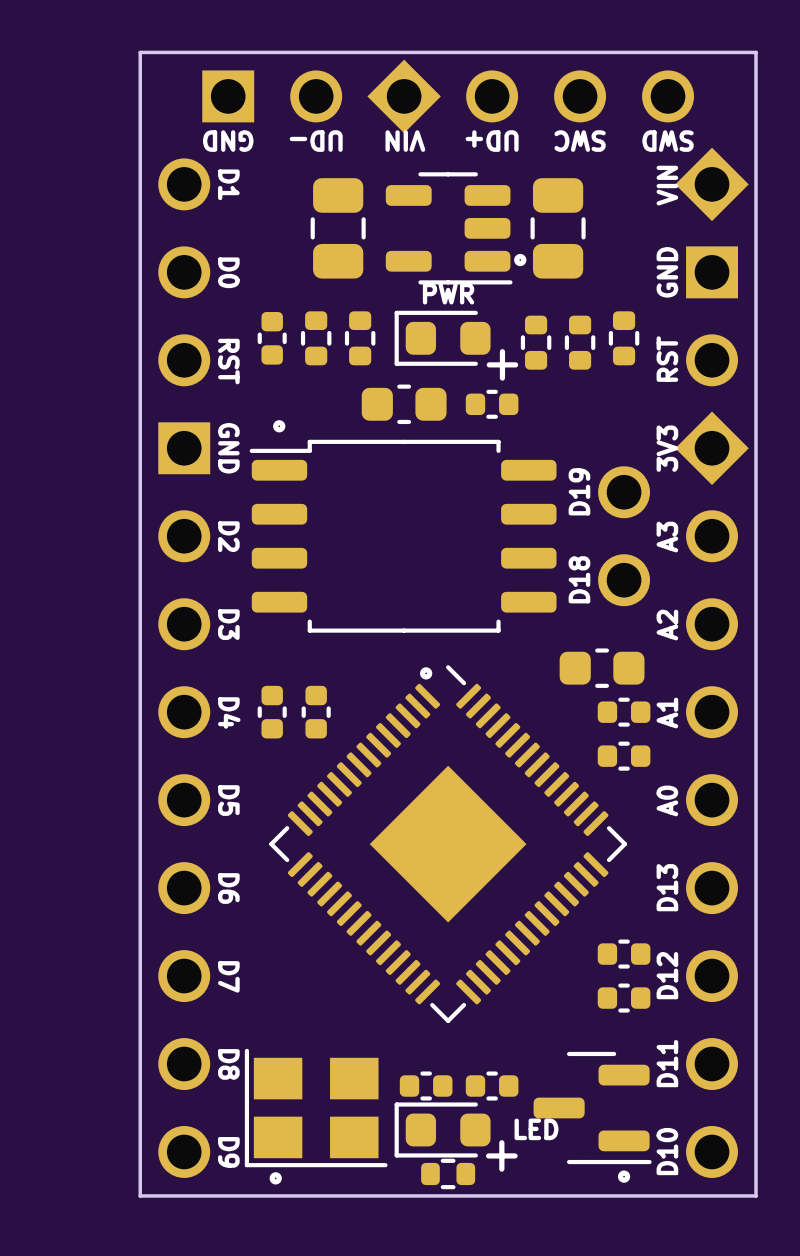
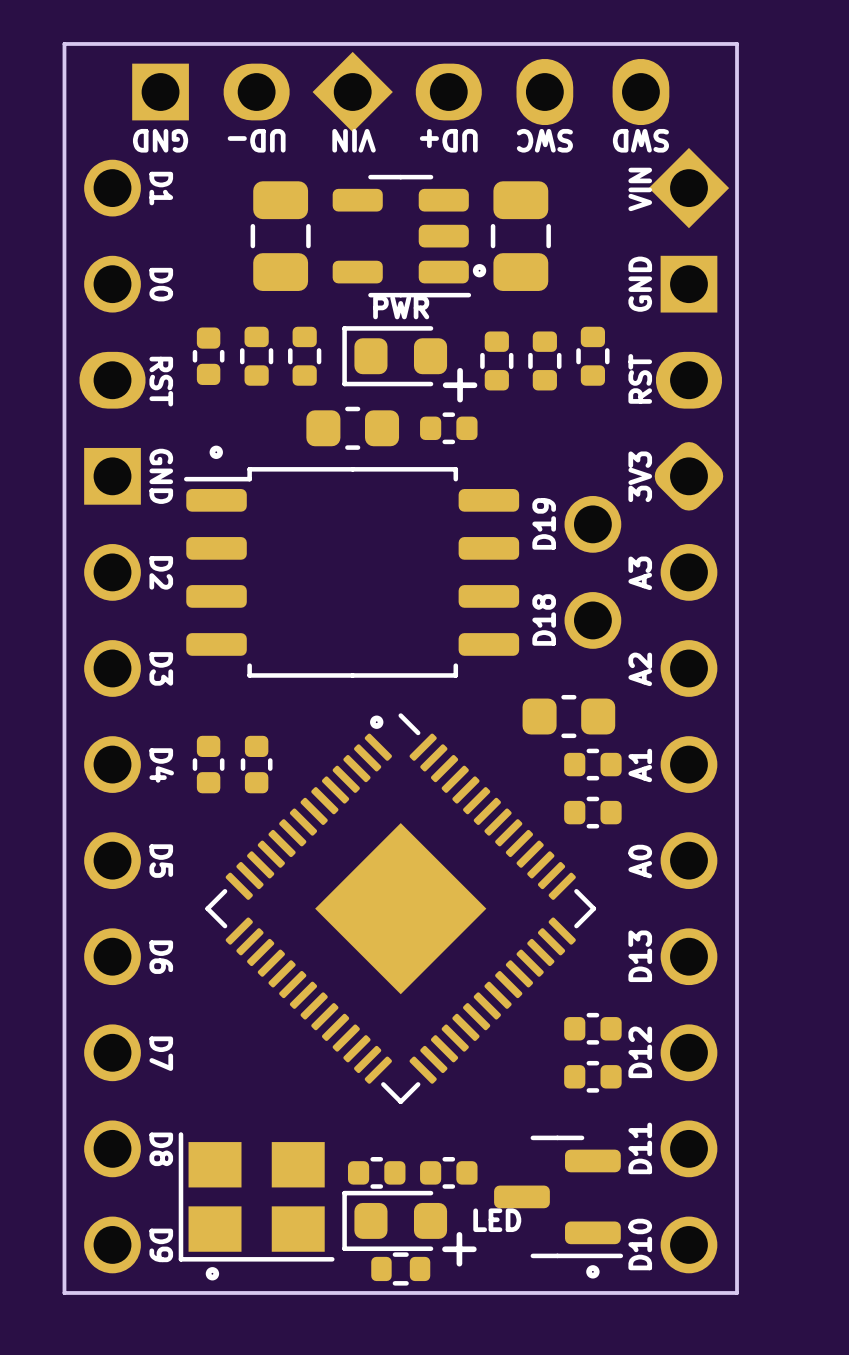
part footprint: [202, 59, 695, 134] -> [132, 51, 670, 133]
part footprint: [675, 147, 749, 1178] -> [648, 147, 730, 1274]
part footprint: [158, 158, 211, 1178] -> [79, 159, 146, 1274]

